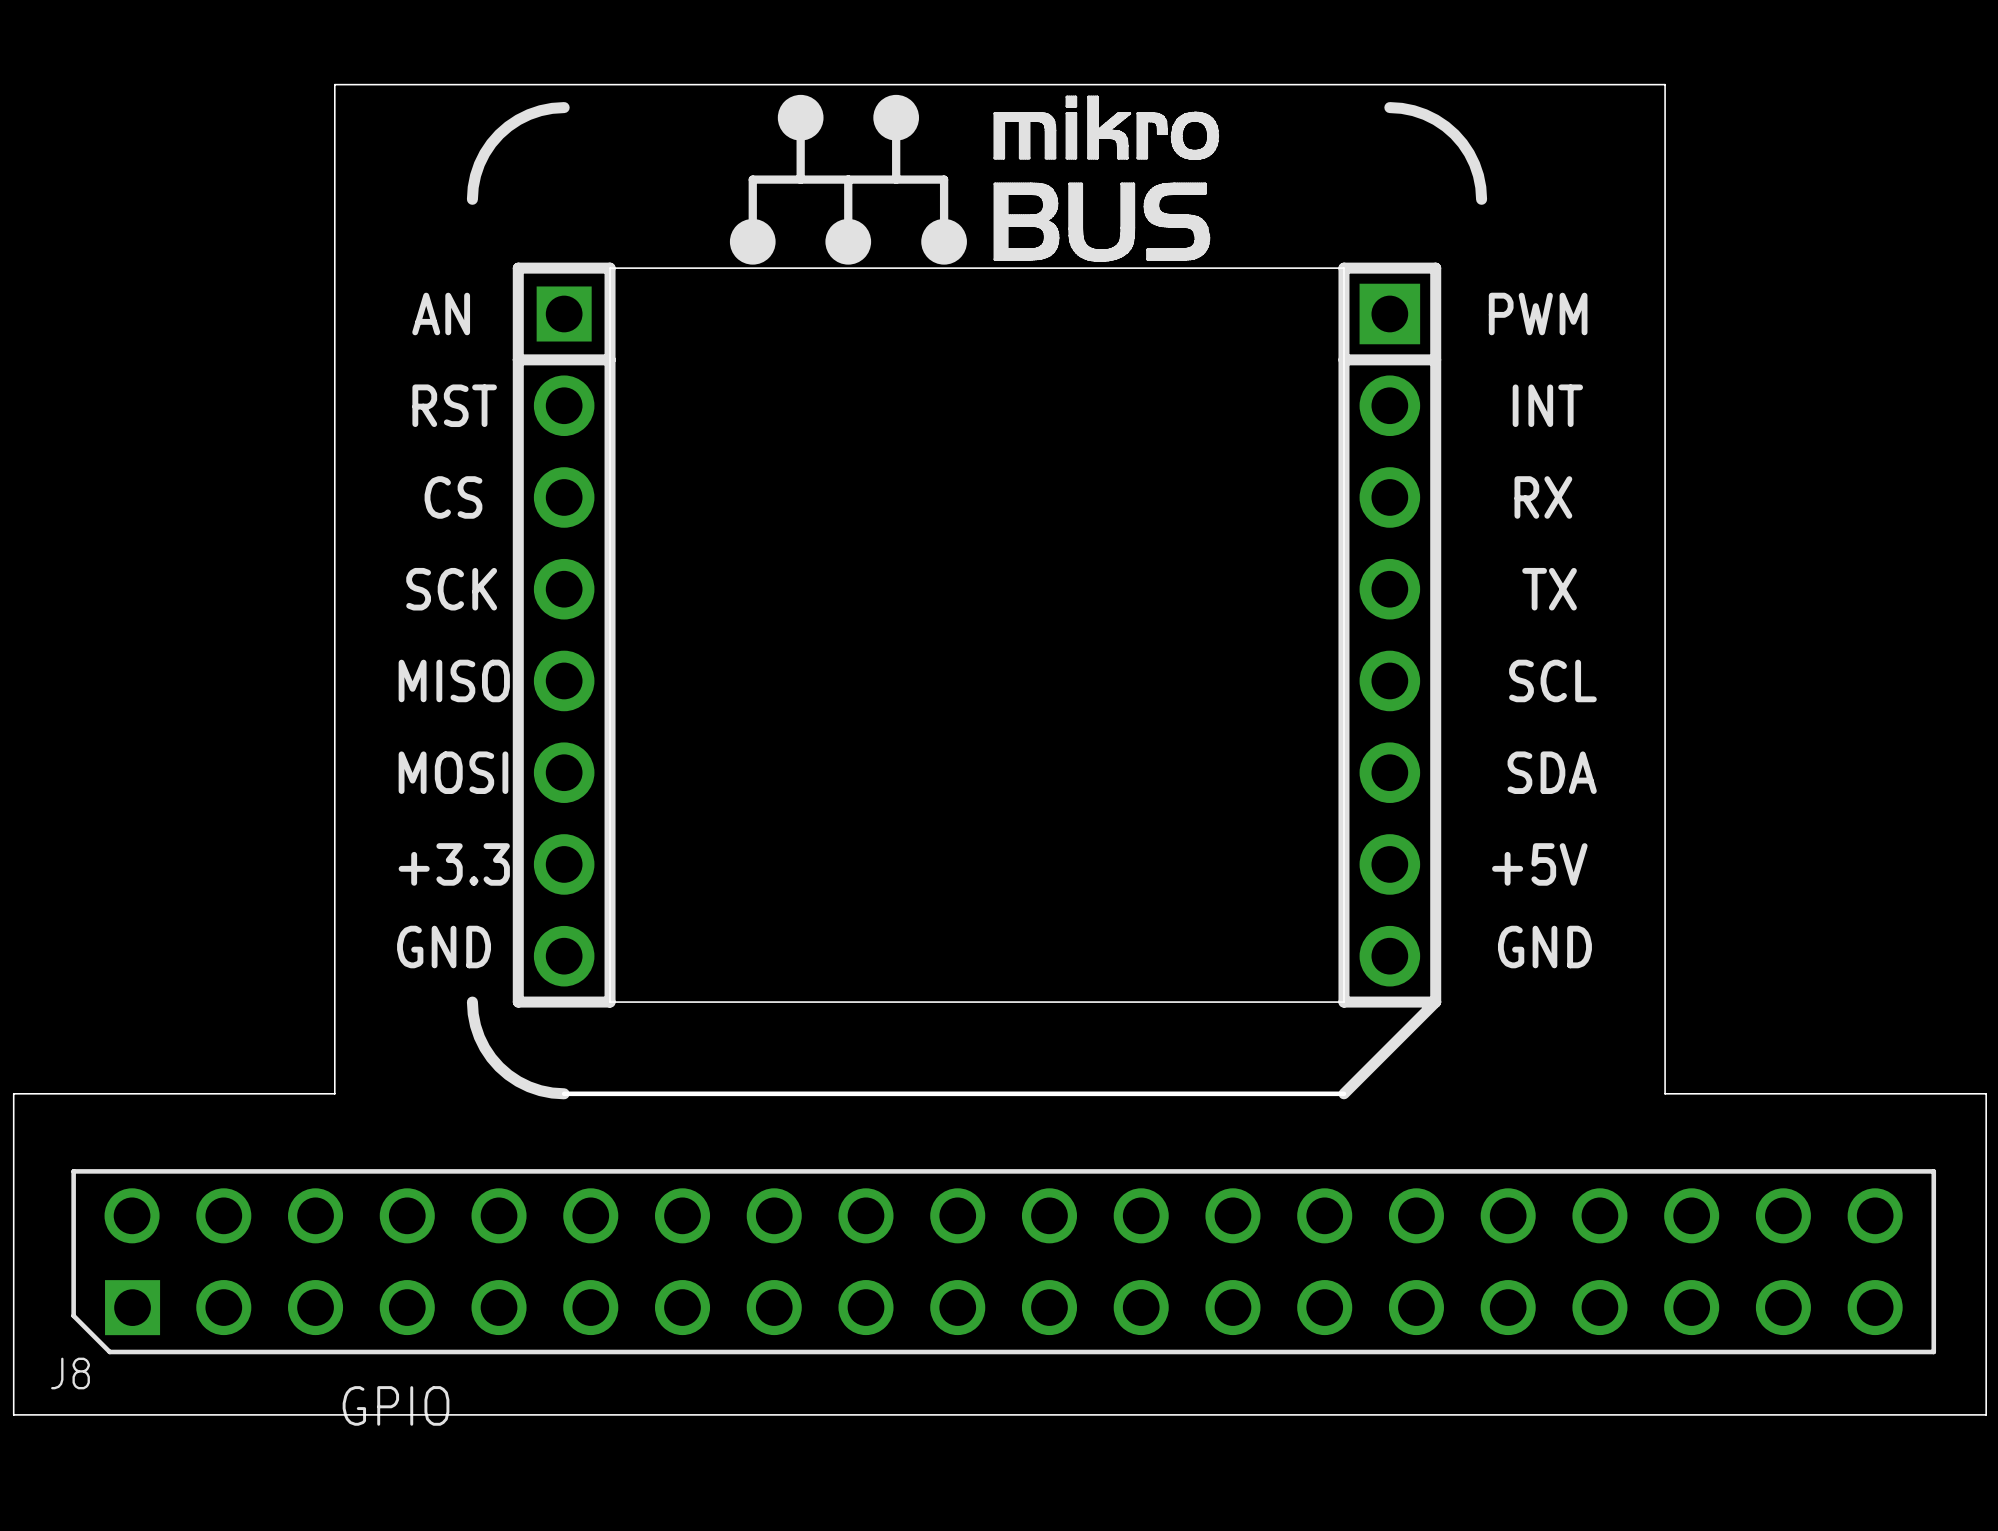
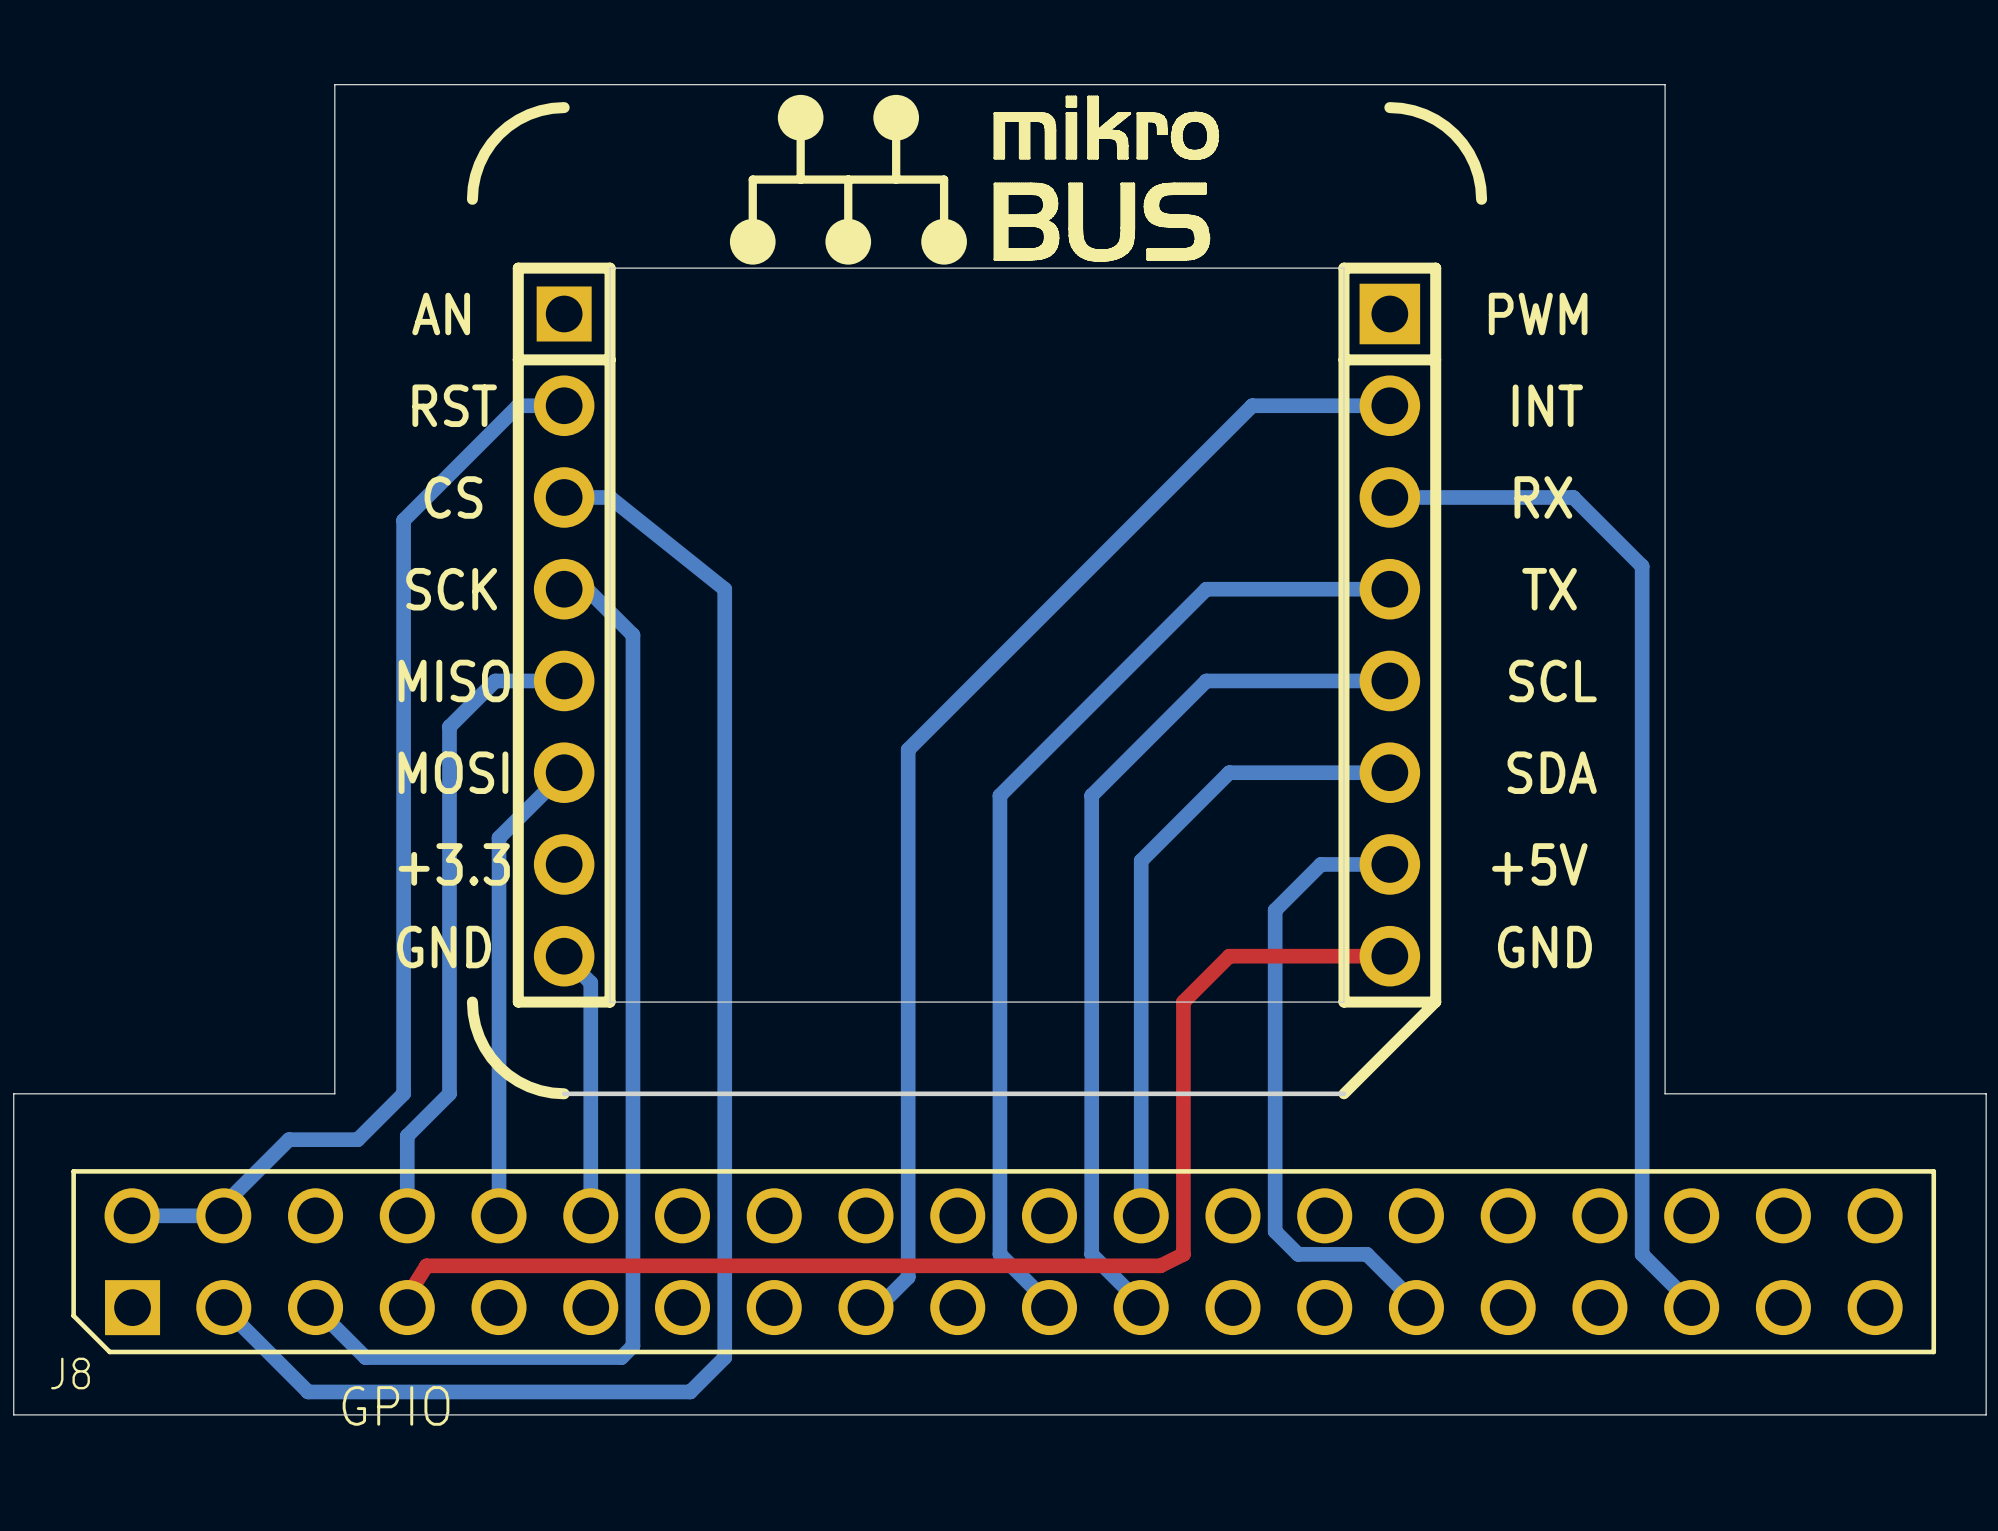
bottom track: none -> (564, 405) (518, 405) (403, 520) (403, 1093) (357, 1139) (288, 1139) (223, 1204) (223, 1215) (132, 1215)
bottom track: none -> (1389, 405) (1252, 405) (908, 749) (908, 1277) (877, 1307) (865, 1307)
bottom track: none -> (564, 497) (610, 497) (724, 589) (724, 1357) (690, 1391) (308, 1391) (223, 1307)
bottom track: none -> (1389, 497) (1573, 497) (1642, 566) (1642, 1254) (1691, 1303) (1691, 1307)
bottom track: none -> (564, 589) (587, 589) (632, 635) (632, 1346) (621, 1357) (365, 1357) (315, 1307)
bottom track: none -> (1389, 589) (1206, 589) (999, 795) (999, 1254) (1042, 1296) (1049, 1296) (1049, 1307)
bottom track: none -> (564, 680) (495, 680) (449, 726) (449, 1093) (407, 1136) (407, 1215)
bottom track: none -> (1389, 680) (1206, 680) (1091, 795) (1091, 1254) (1141, 1303) (1141, 1307)
bottom track: none -> (564, 772) (499, 837) (499, 1215)
bottom track: none -> (1389, 772) (1229, 772) (1141, 860) (1141, 1215)
bottom track: none -> (1389, 864) (1321, 864) (1275, 910) (1275, 1231) (1298, 1254) (1366, 1254) (1416, 1303) (1416, 1307)
bottom track: none -> (564, 956) (590, 982) (590, 1215)
top track: none -> (1389, 956) (1229, 956) (1183, 1002) (1183, 1254) (1160, 1265) (426, 1265) (407, 1296) (407, 1307)

